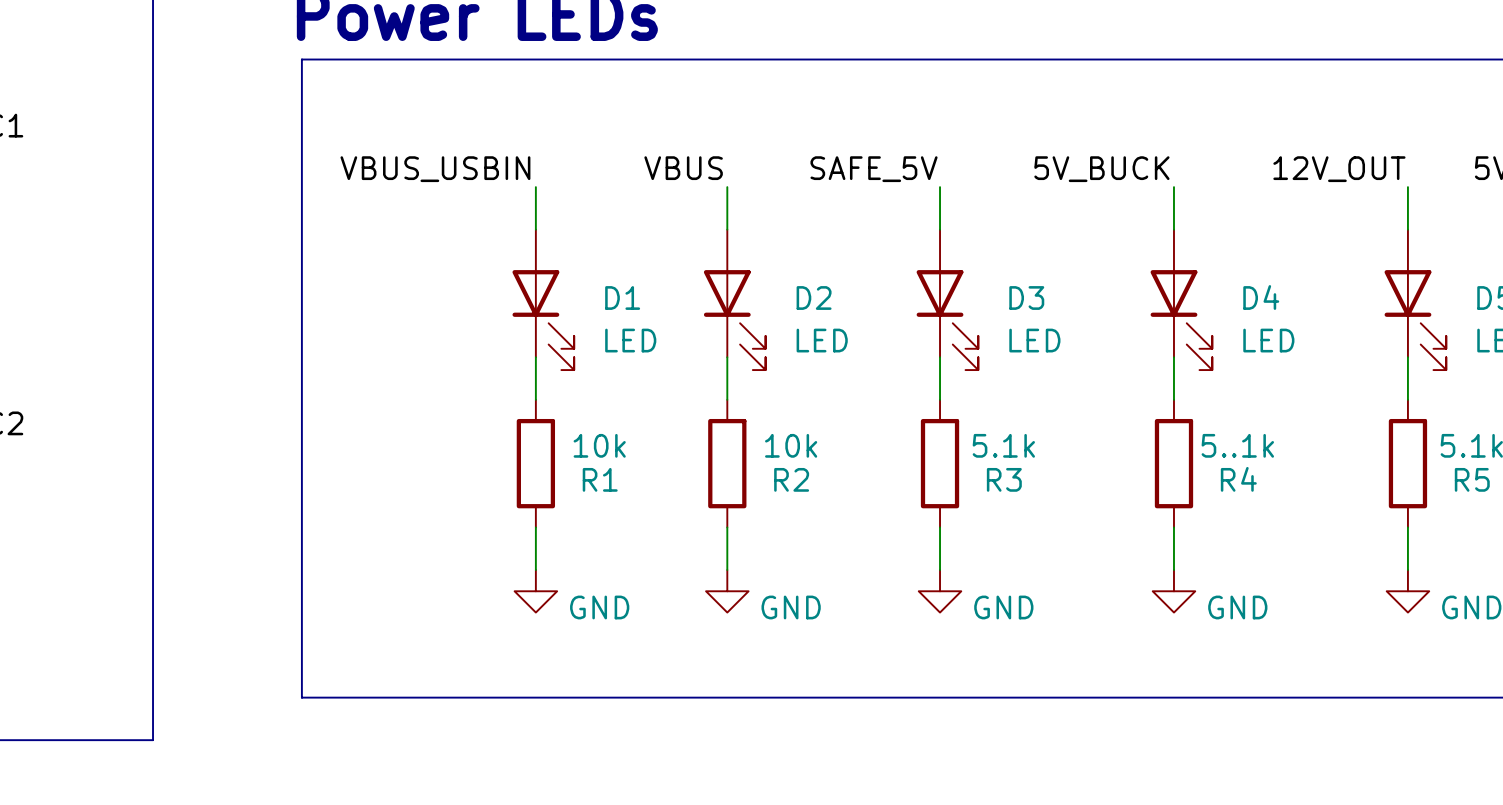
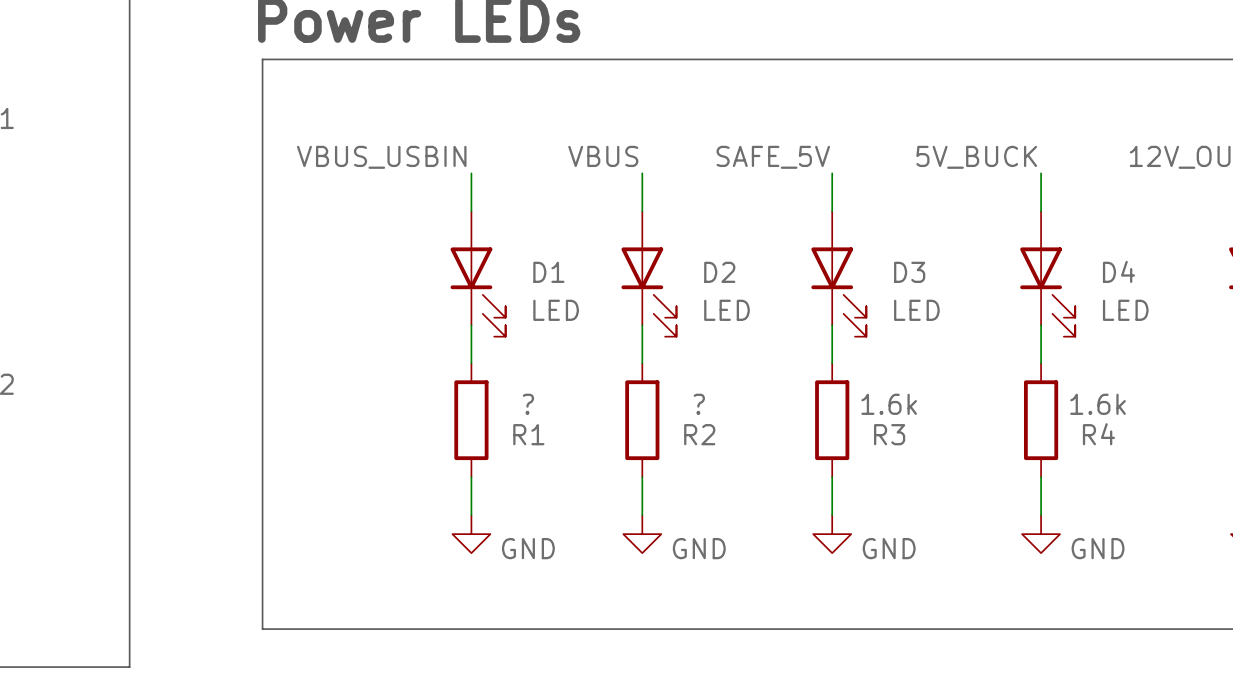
R1 value: 10k (599, 445) -> ? (528, 404)
R2 value: 10k (791, 445) -> ? (699, 404)
R3 value: 5.1k (1003, 445) -> 1.6k (889, 404)
R4 value: 5..1k (1237, 445) -> 1.6k (1098, 404)

